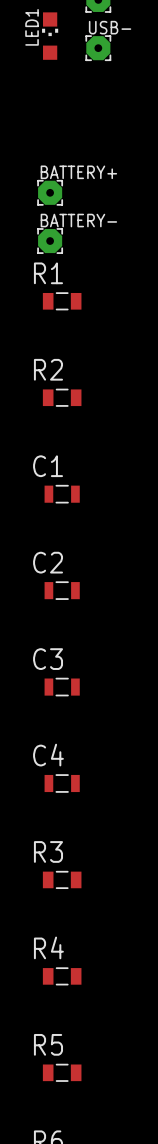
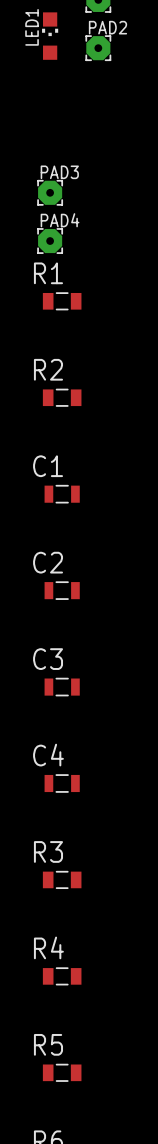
USB- name: USB- (110, 27) -> PAD2 (107, 27)
BATTERY+ name: BATTERY+ (78, 172) -> PAD3 (59, 172)
BATTERY- name: BATTERY- (78, 220) -> PAD4 (60, 220)

